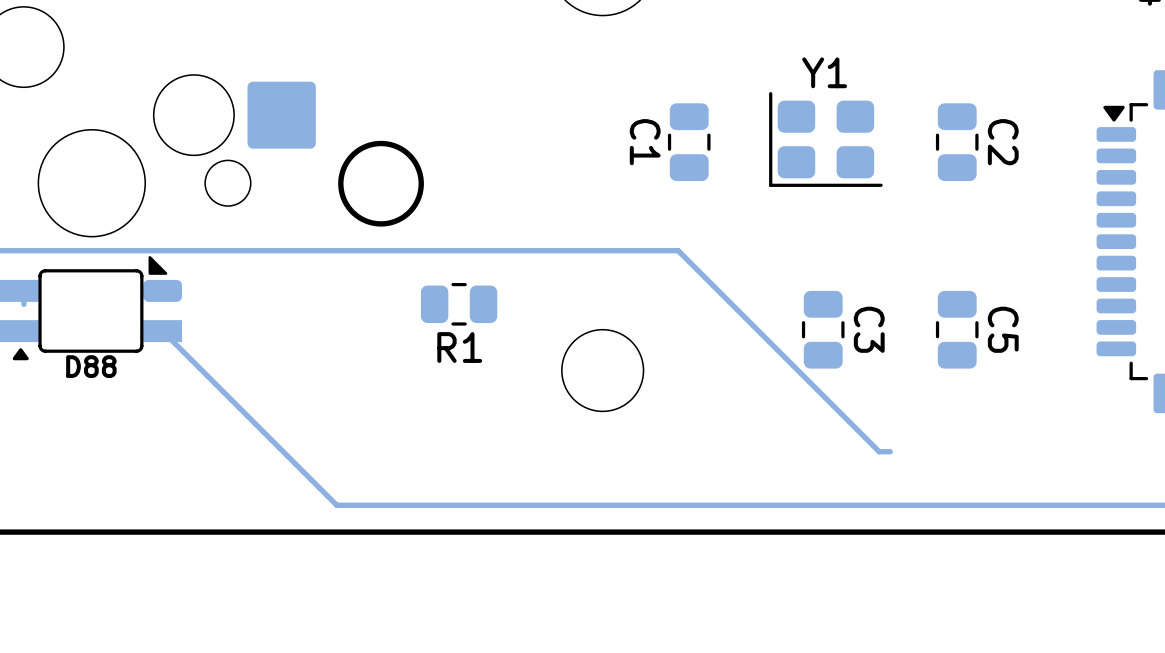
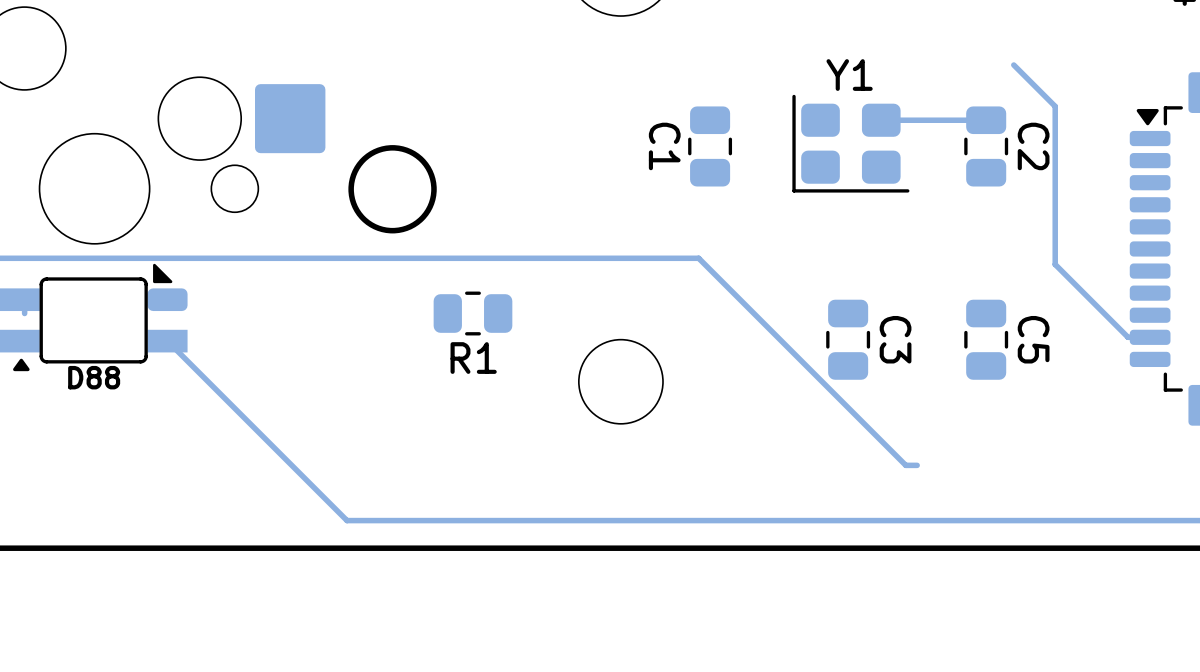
track: none -> (1013, 65) (1055, 106) (1055, 264) (1128, 337) (1150, 337)
track: none -> (986, 120) (881, 120)

